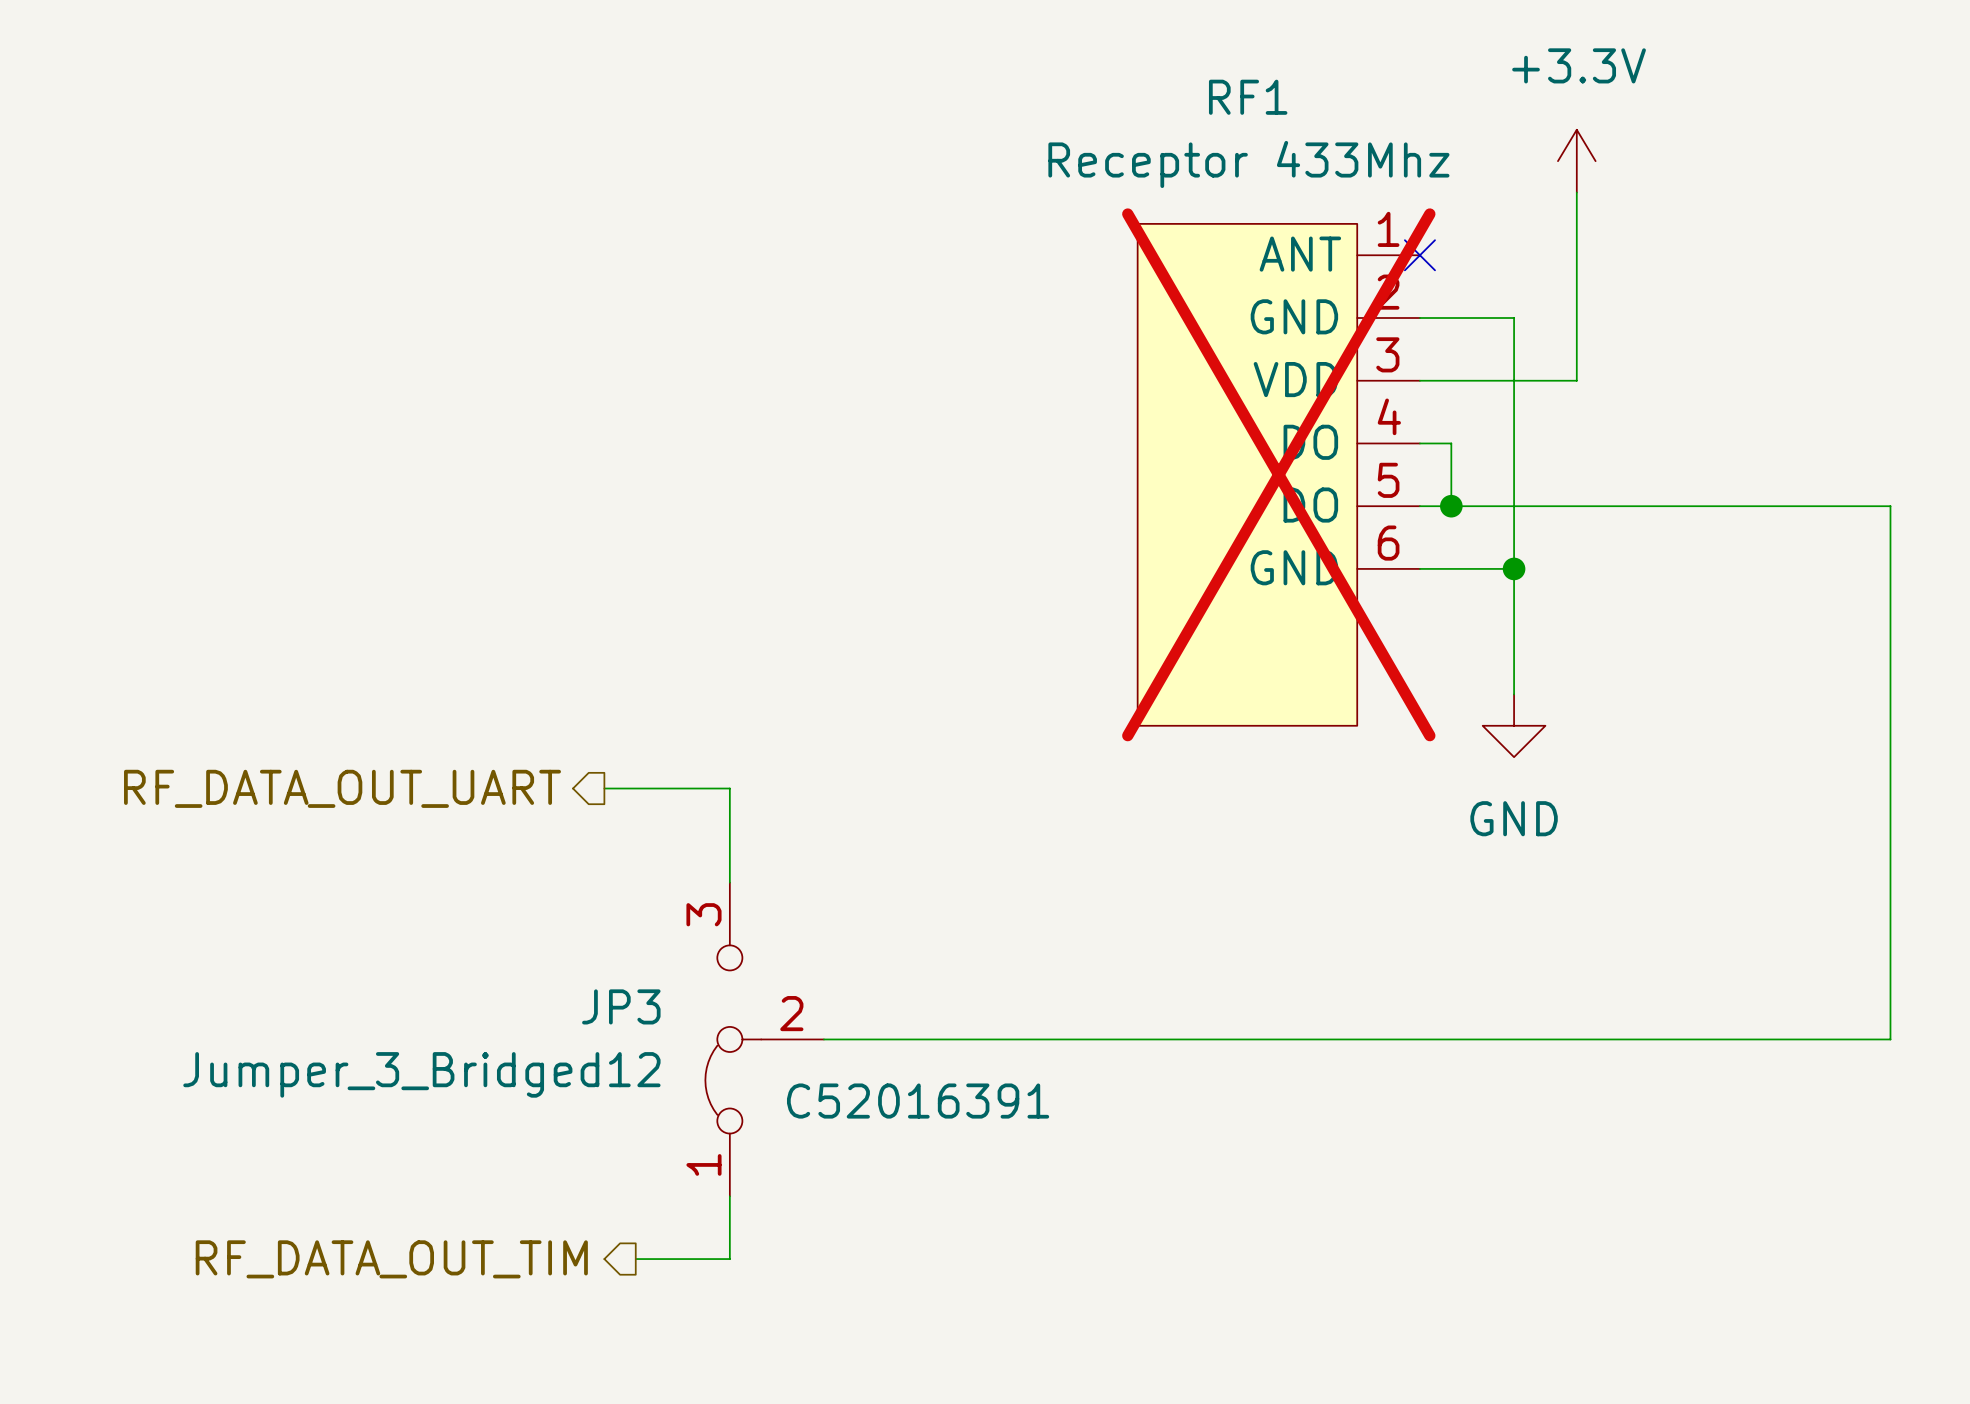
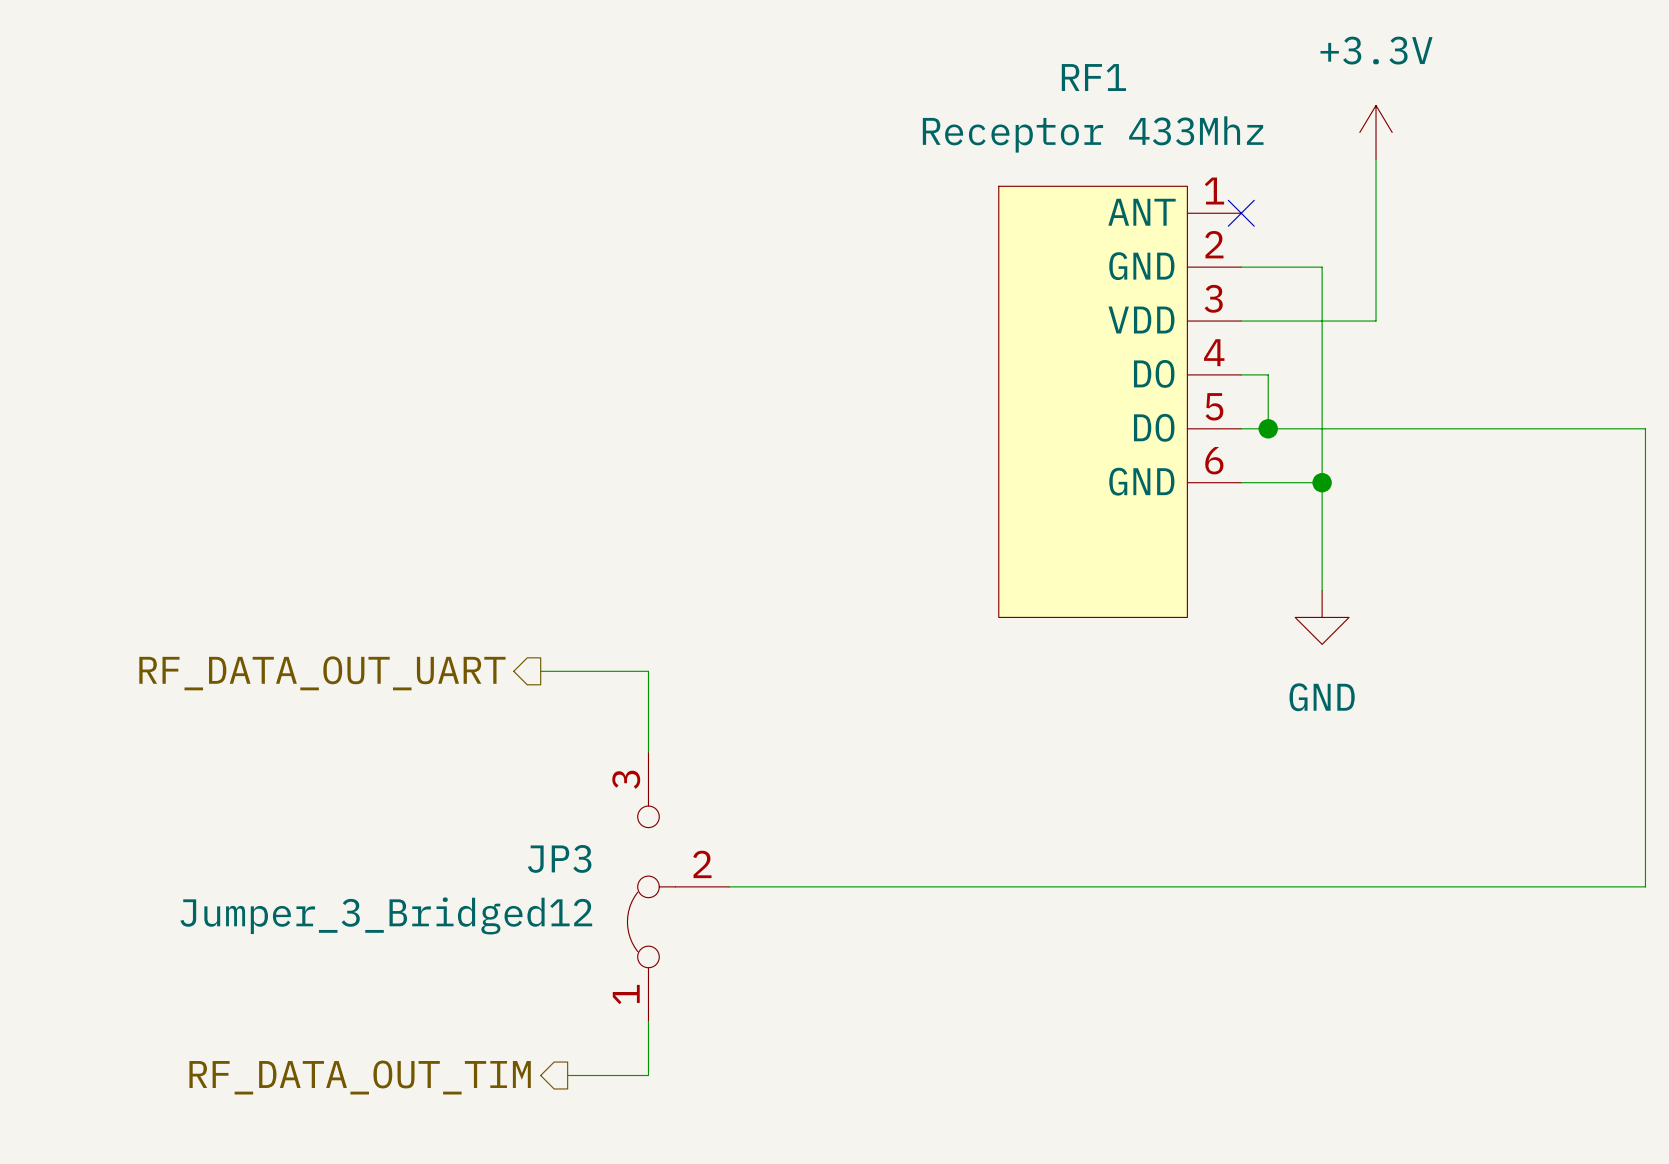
RF1 do-not-place cross: (1278, 474) -> none
JP3 text: C52016391 (918, 1101) -> none

